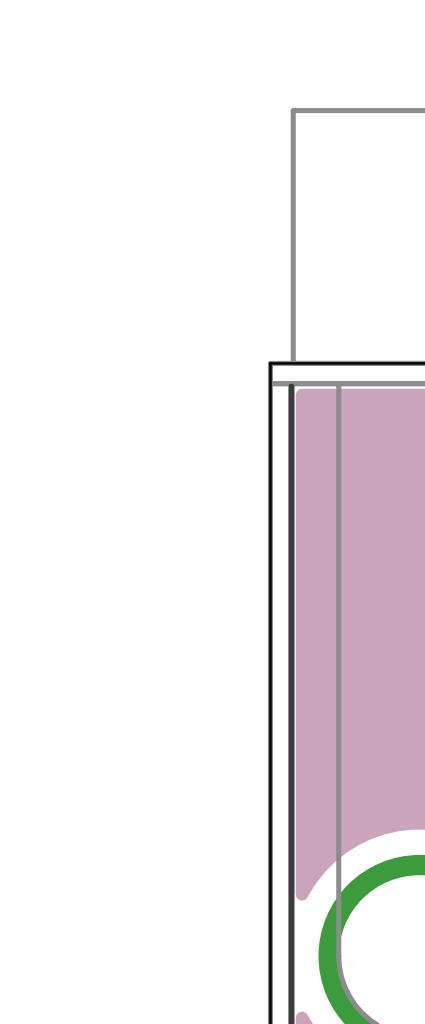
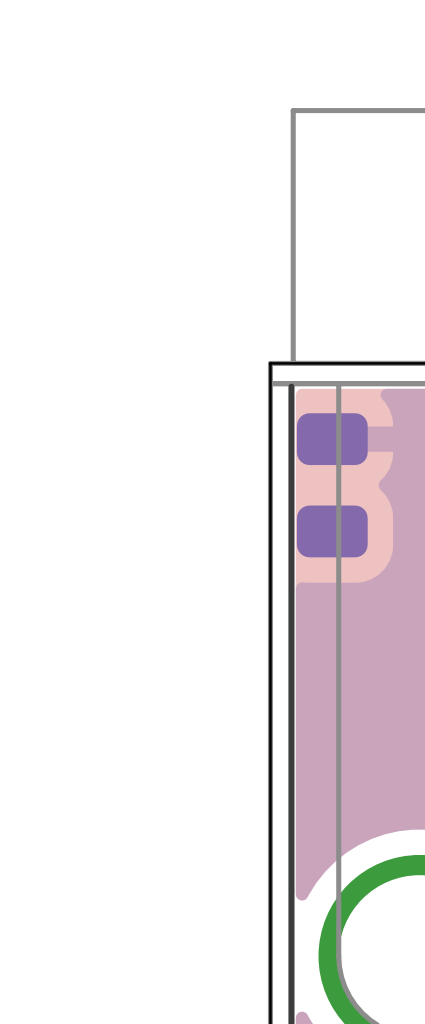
part: none -> (332, 485)

